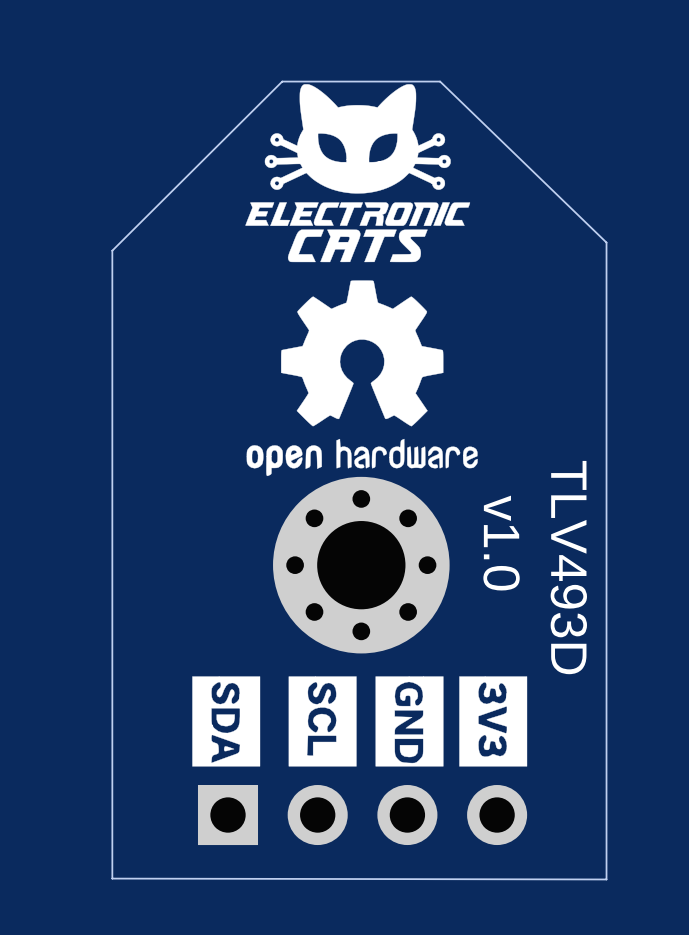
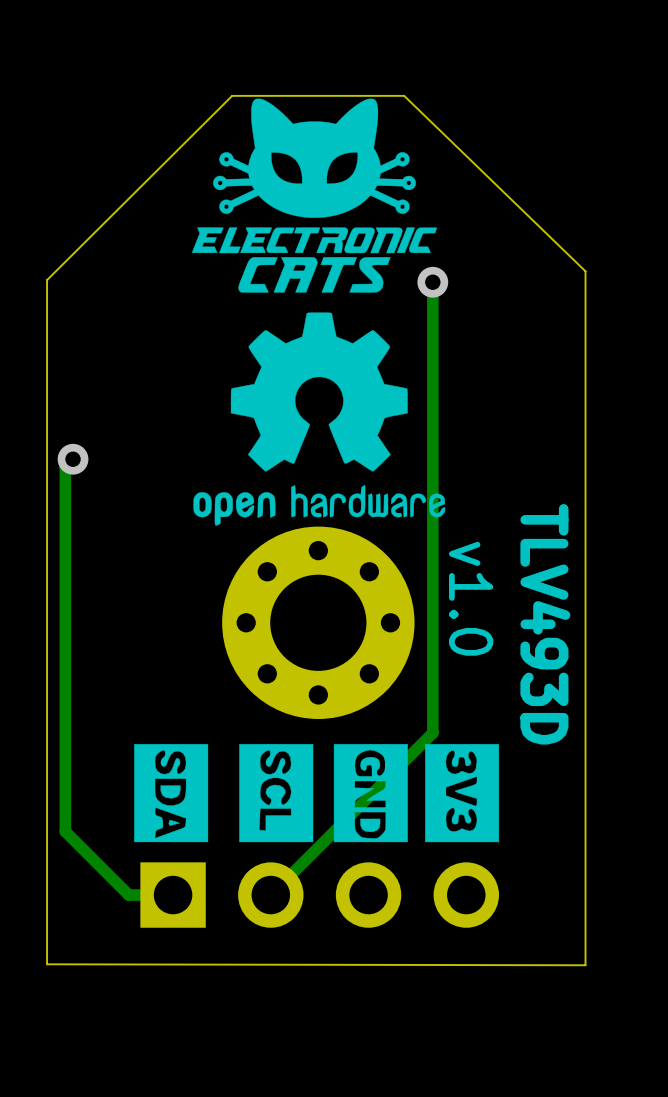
track: none -> (432, 282) (432, 733) (270, 895)
via: none -> (432, 282)
track: none -> (73, 459) (65, 466) (65, 831) (128, 895) (173, 895)
via: none -> (73, 459)

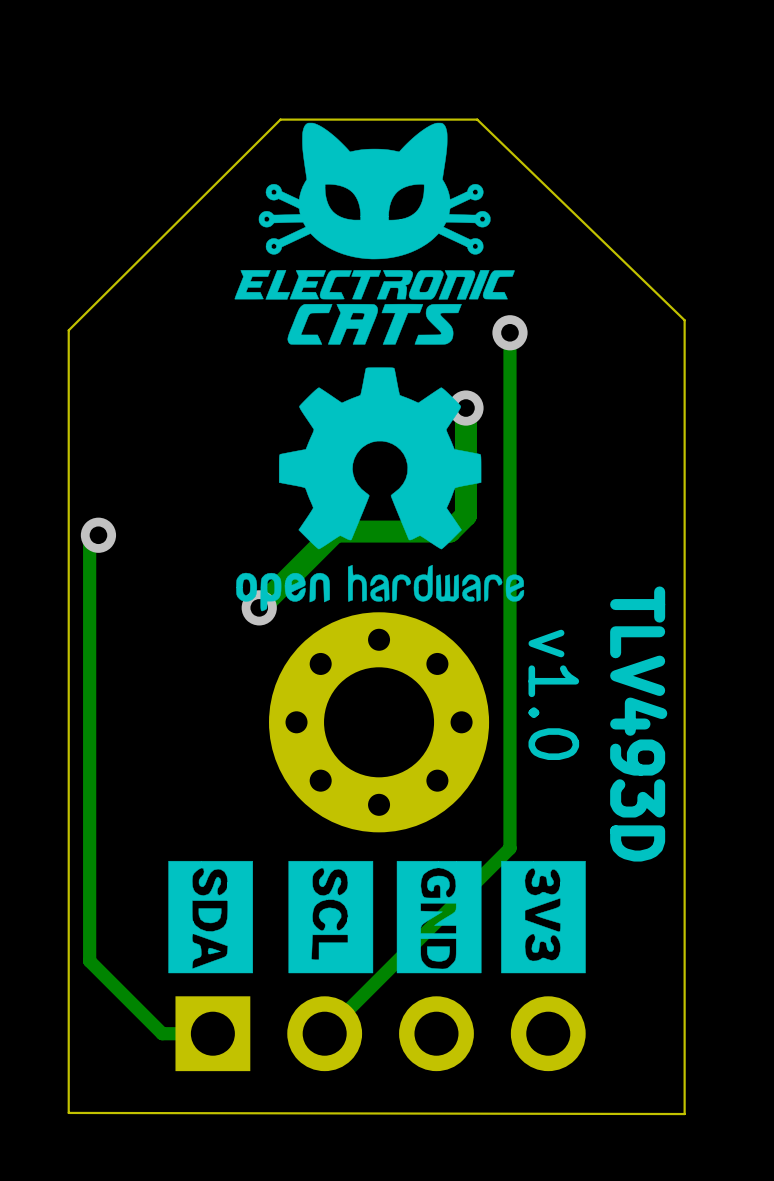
track: none -> (465, 408) (465, 515) (449, 531) (335, 531) (259, 607)
via: none -> (465, 408)
via: none -> (259, 607)

